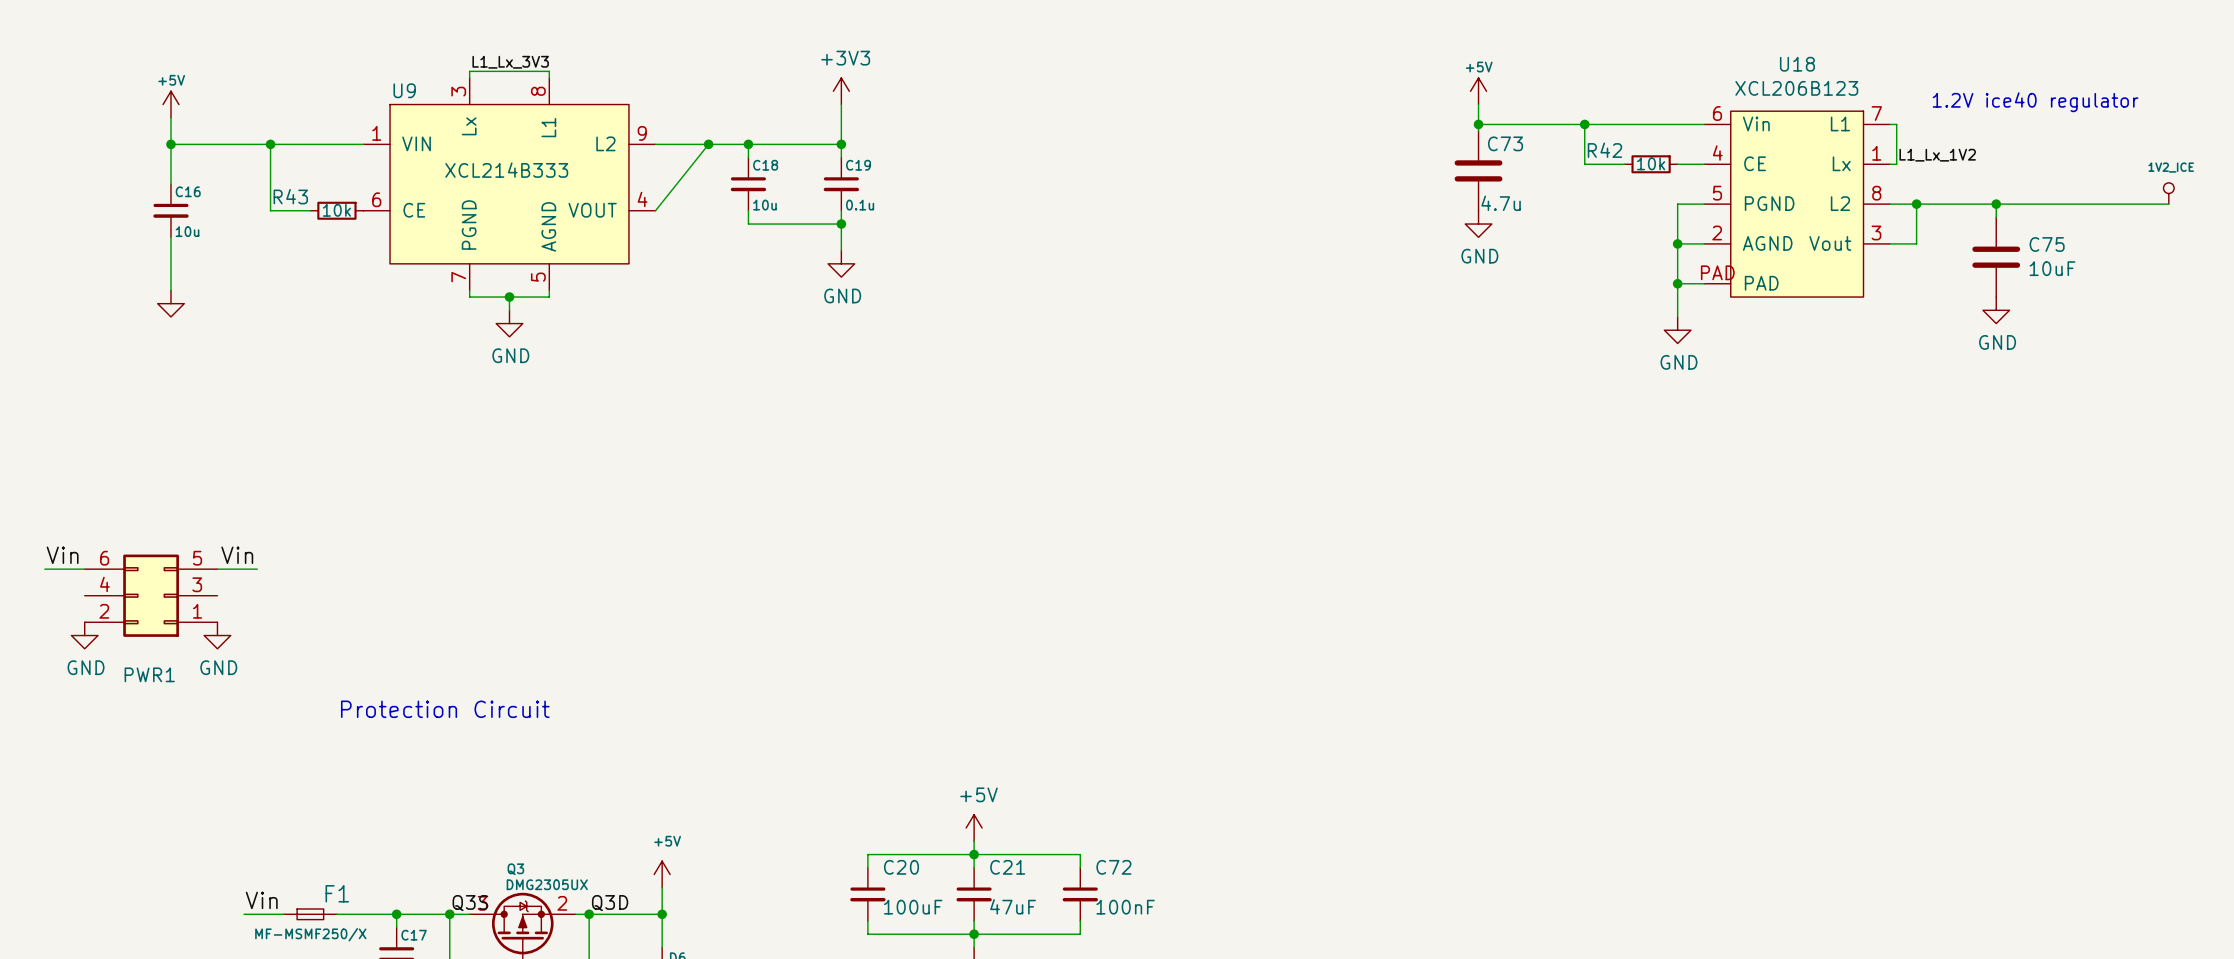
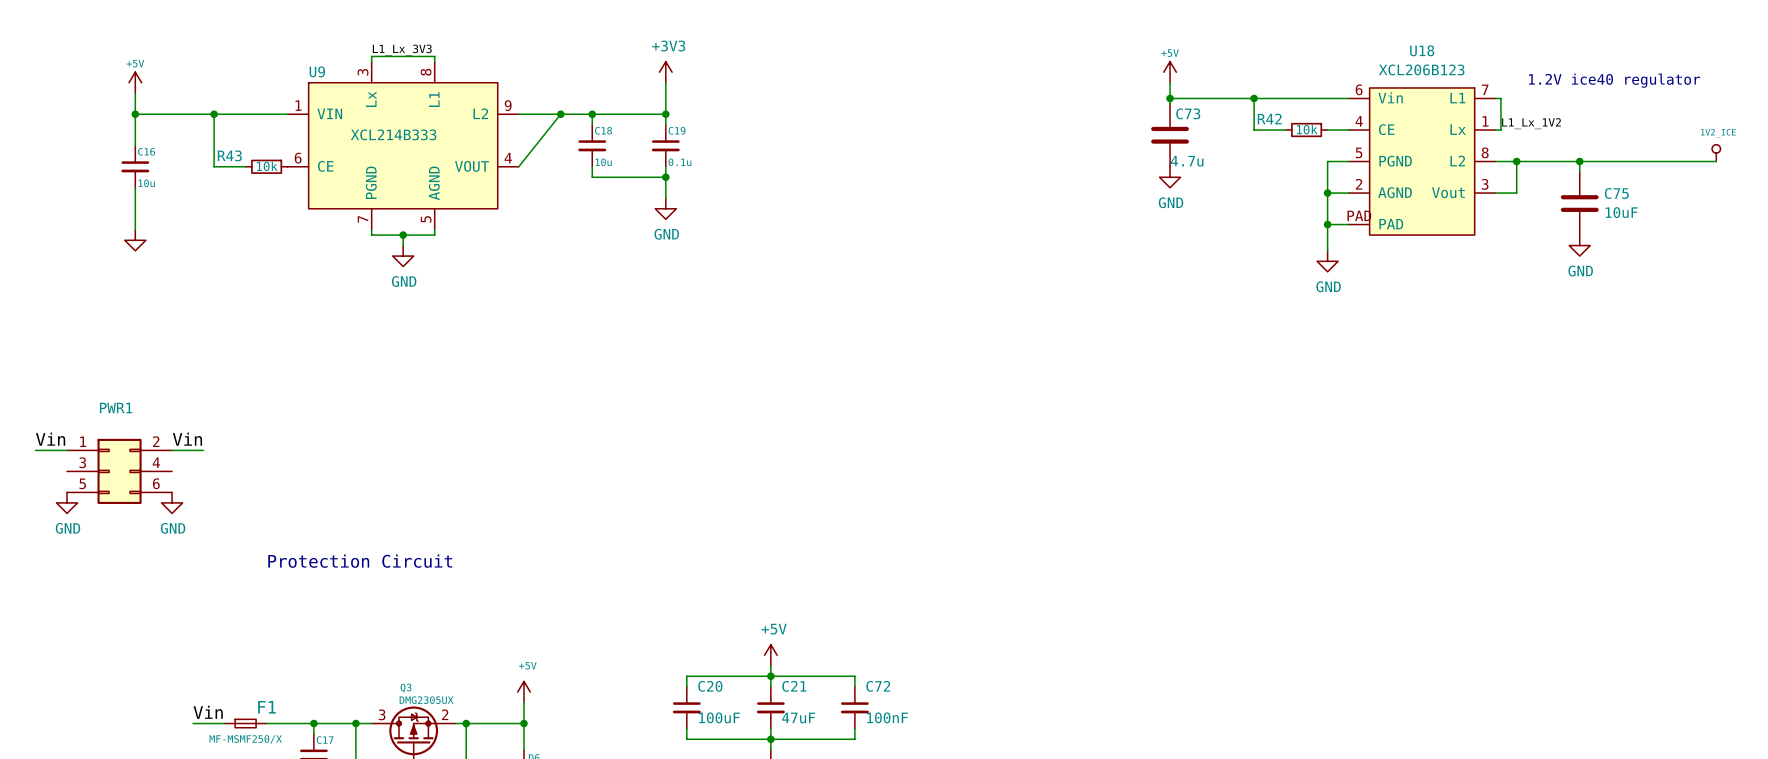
PWR1 rotation: 0° (151, 595) -> 180° (119, 471)
label: Q3S (470, 903) -> none
label: Q3D (610, 903) -> none

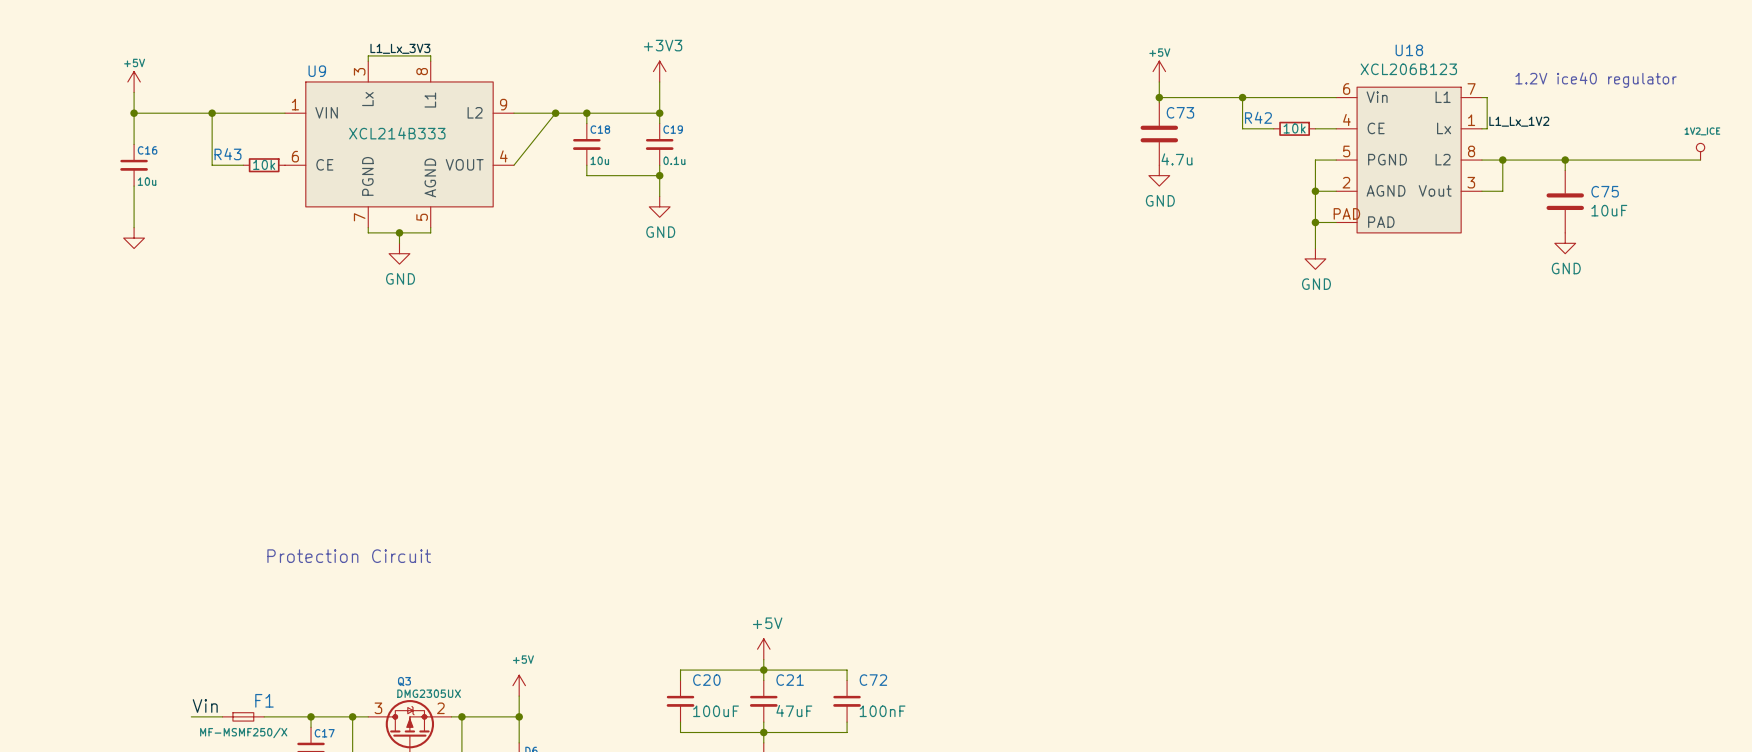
label: Vin (50, 439) -> none
label: Vin (187, 439) -> none
wire: (35, 450) (67, 450) -> none
wire: (172, 450) (203, 450) -> none
PWR1: (119, 471) -> none
power symbol: GND (67, 502) -> none
power symbol: GND (172, 502) -> none

